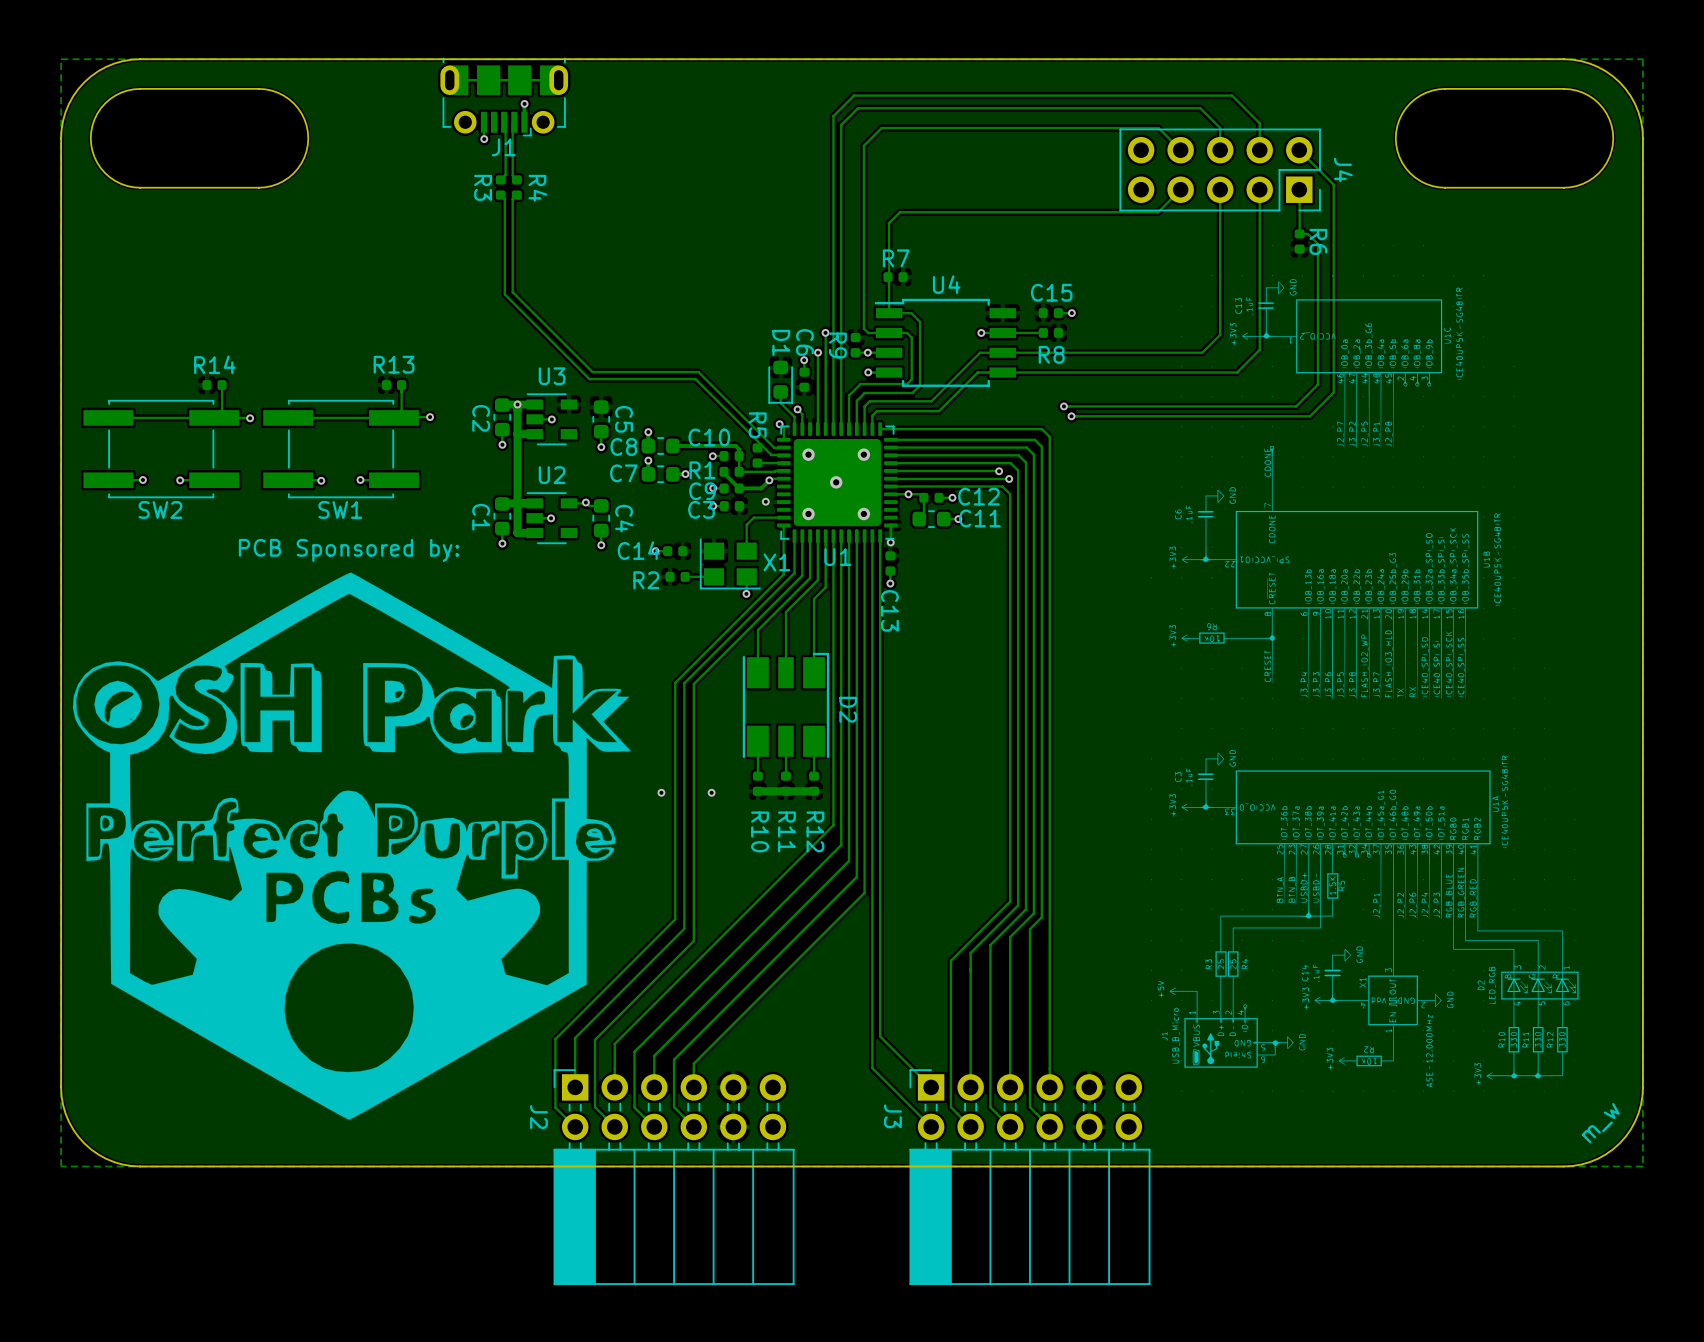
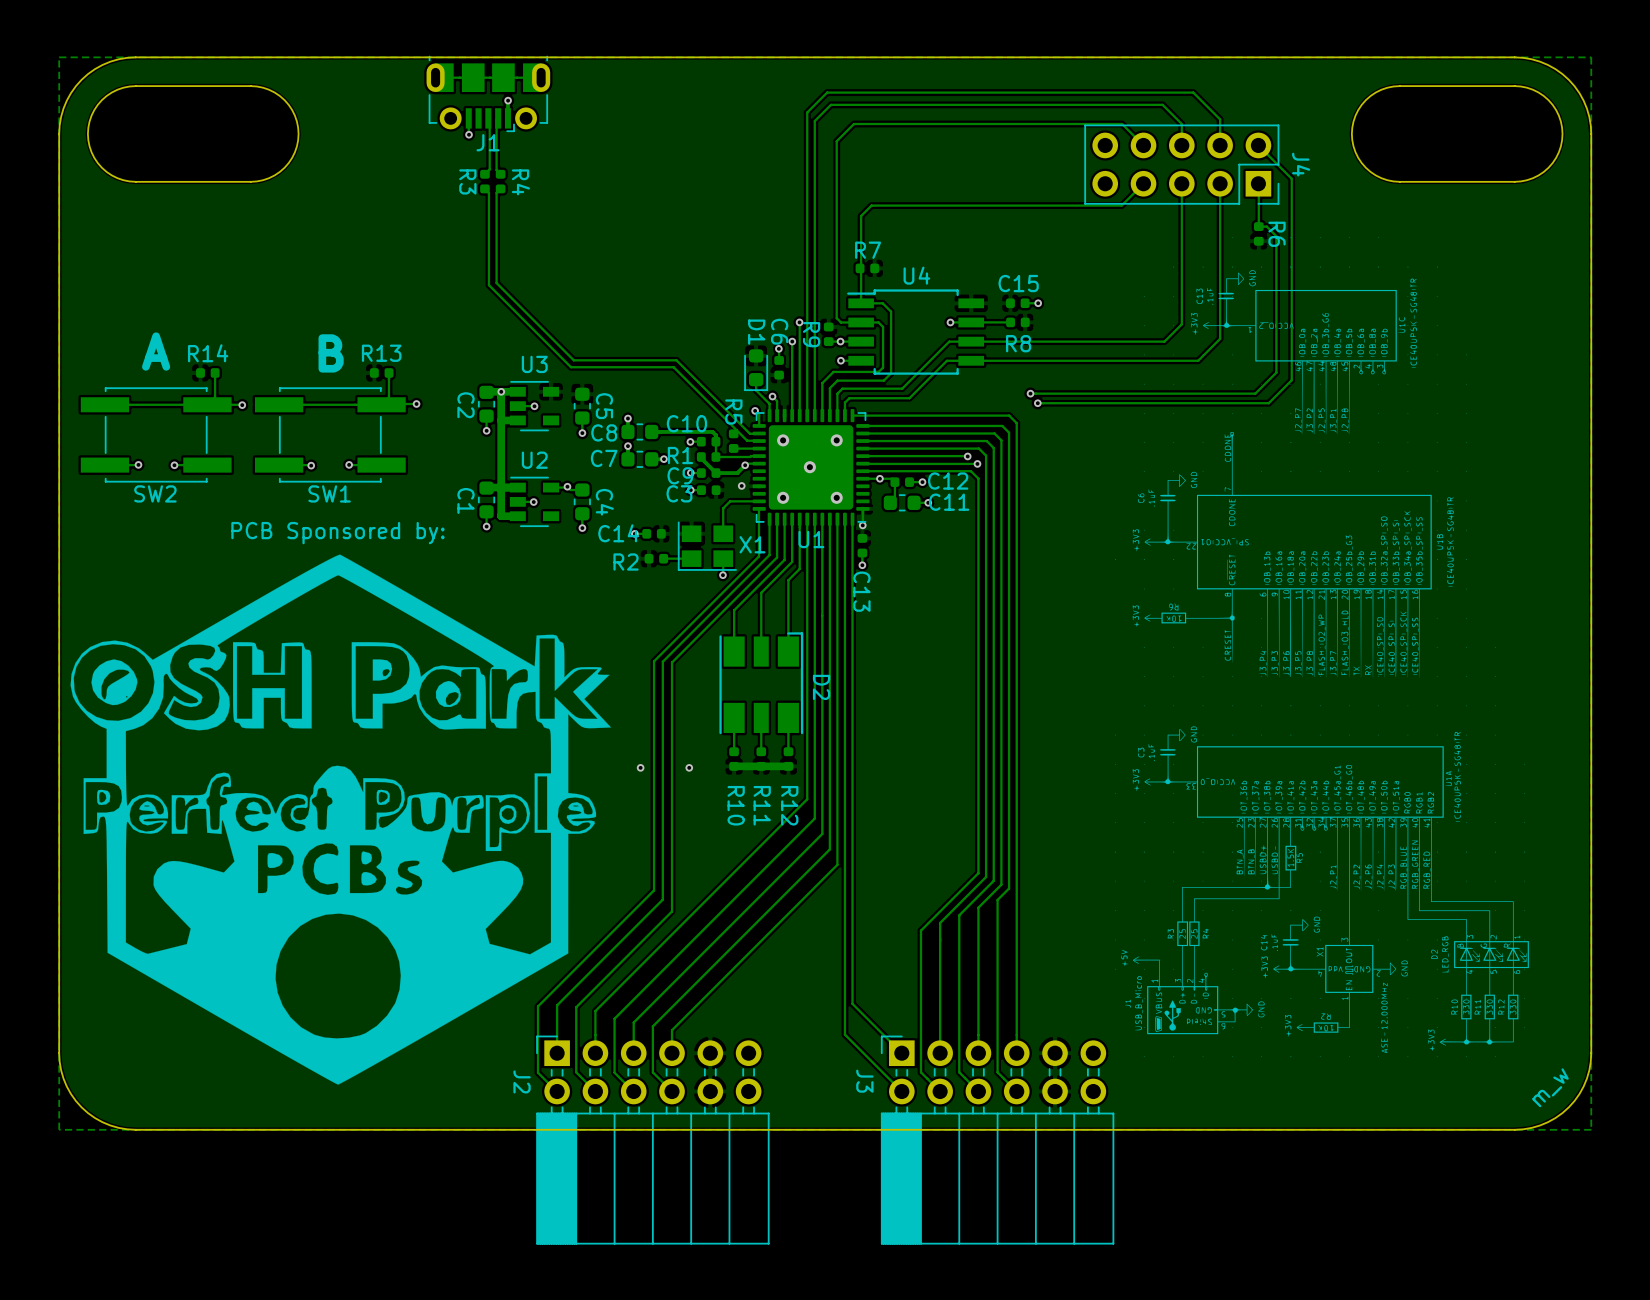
text: none -> A (156, 351)
text: none -> B (331, 353)

